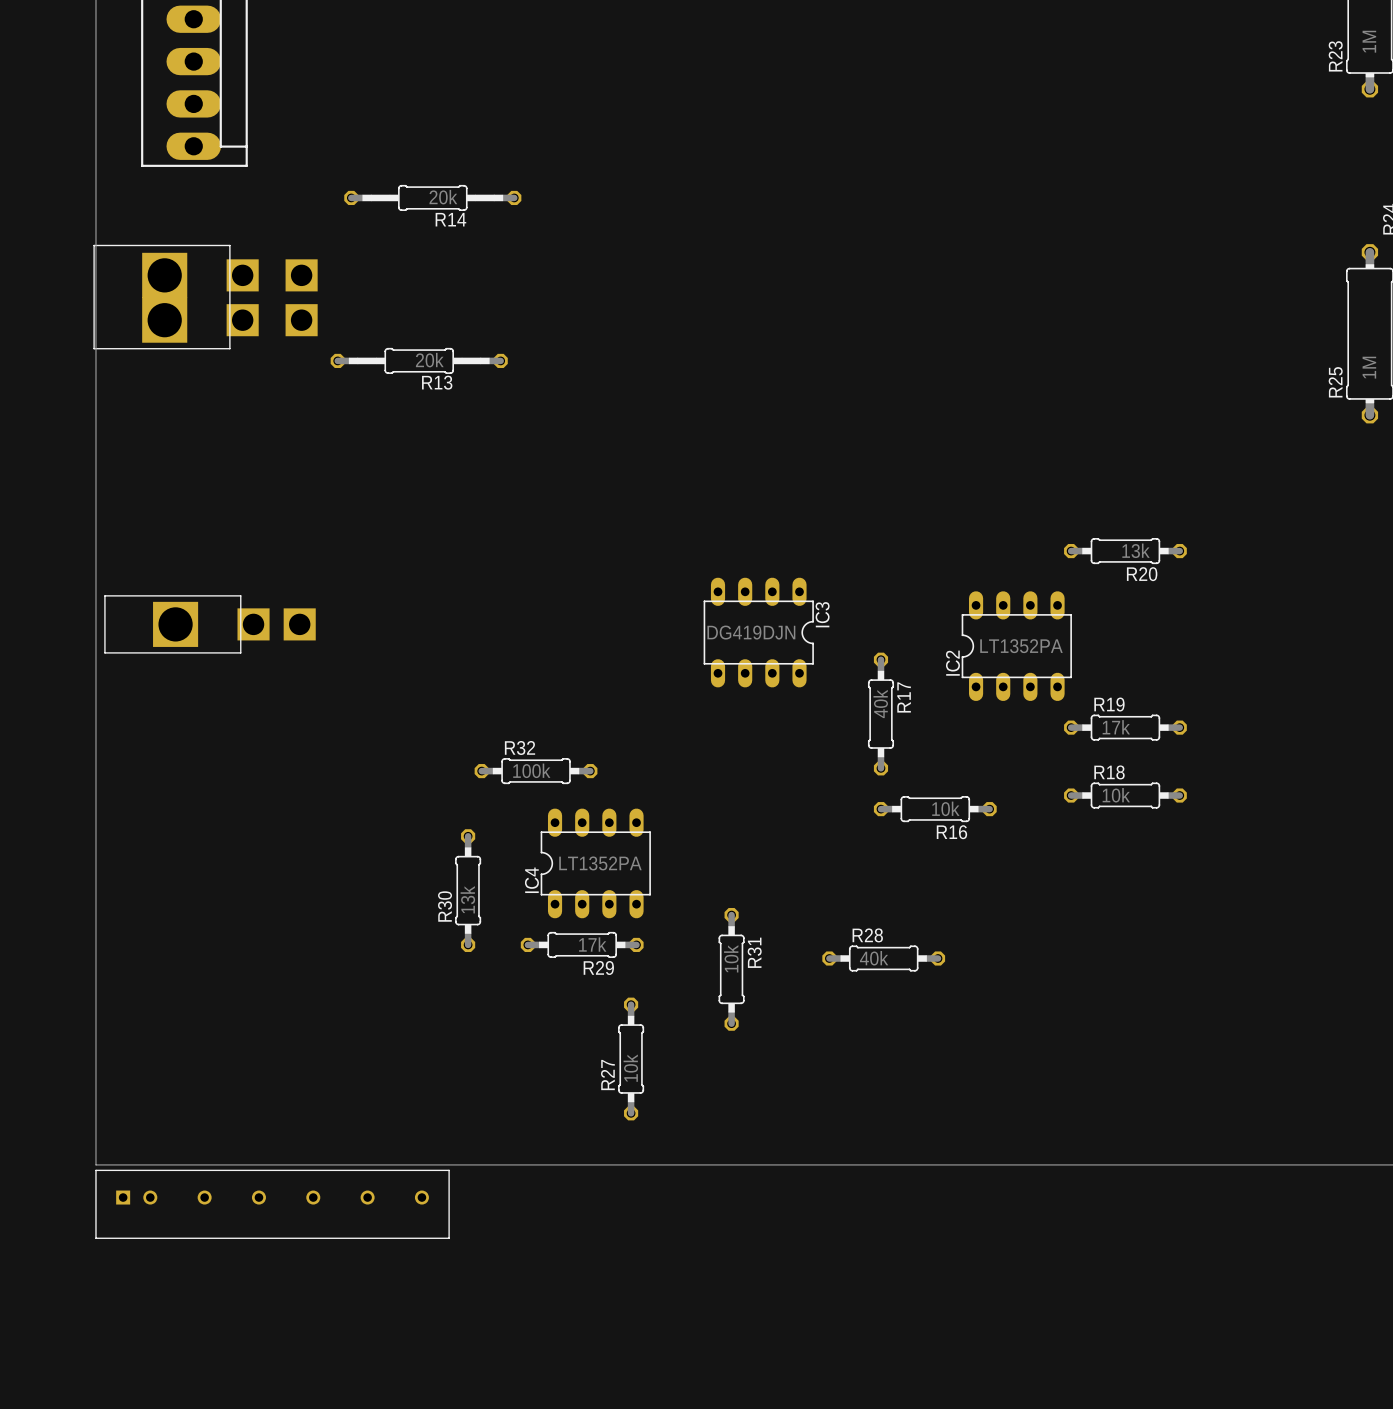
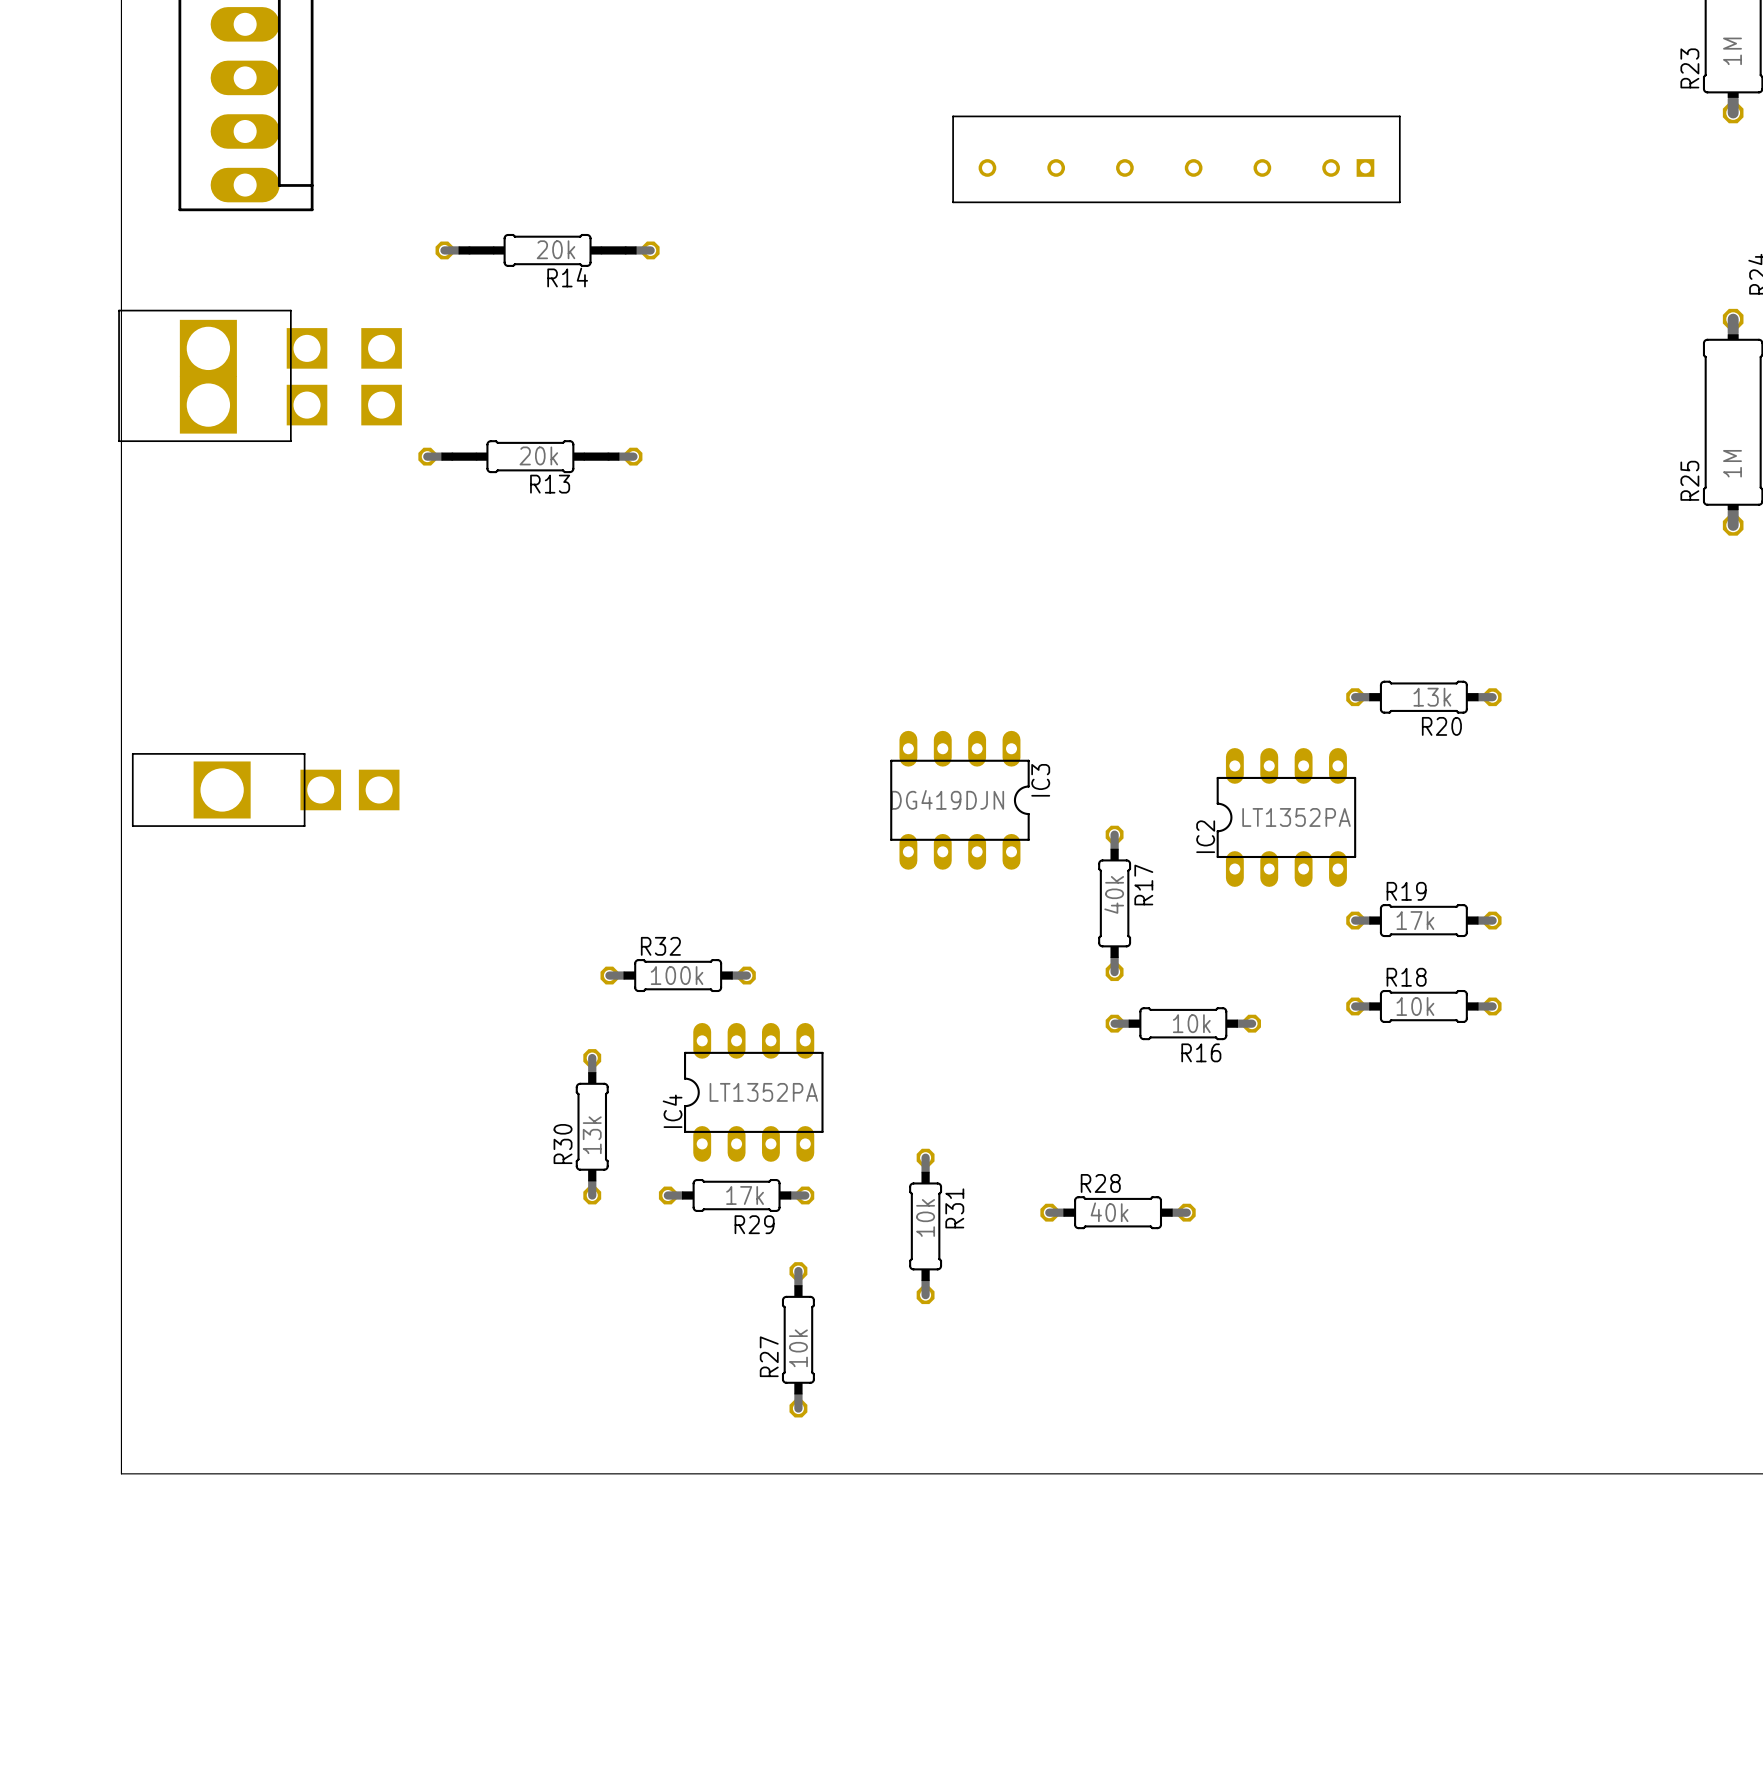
part: none -> (1176, 159)
part: (272, 1204) -> none

